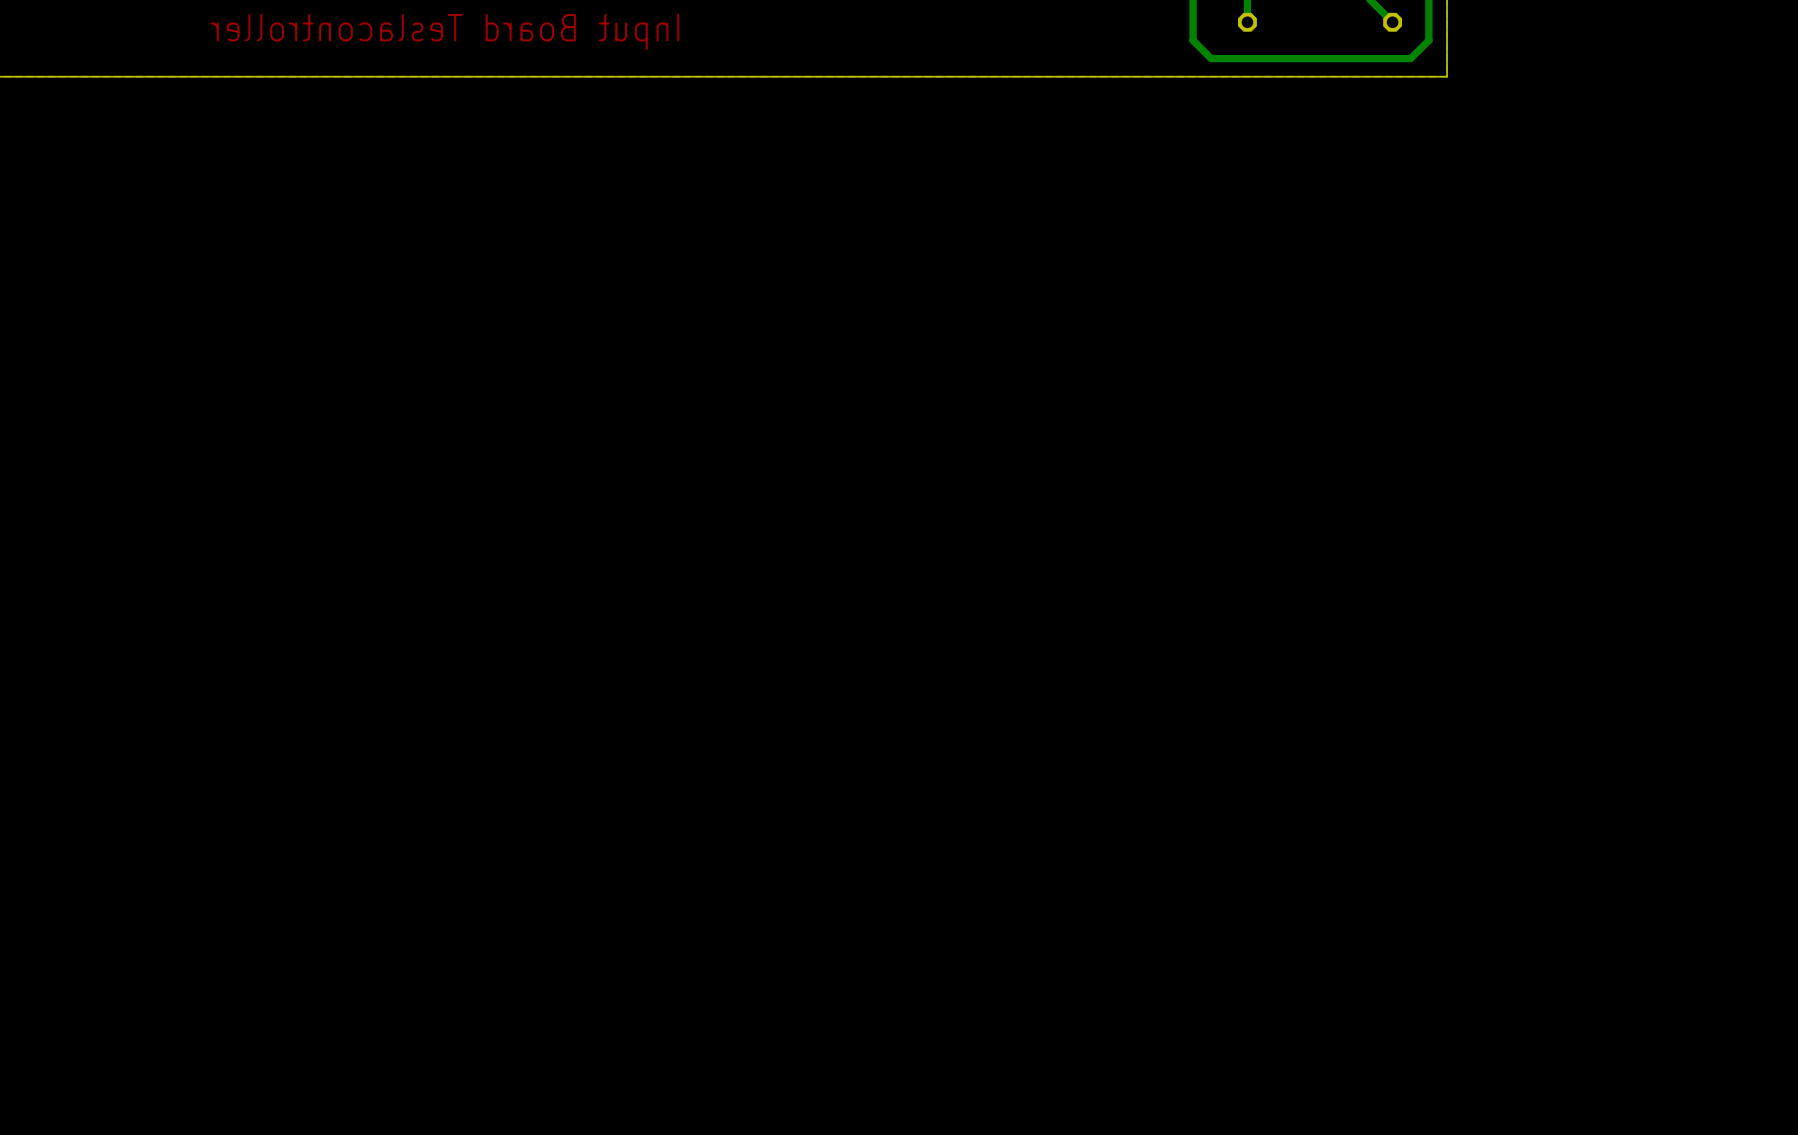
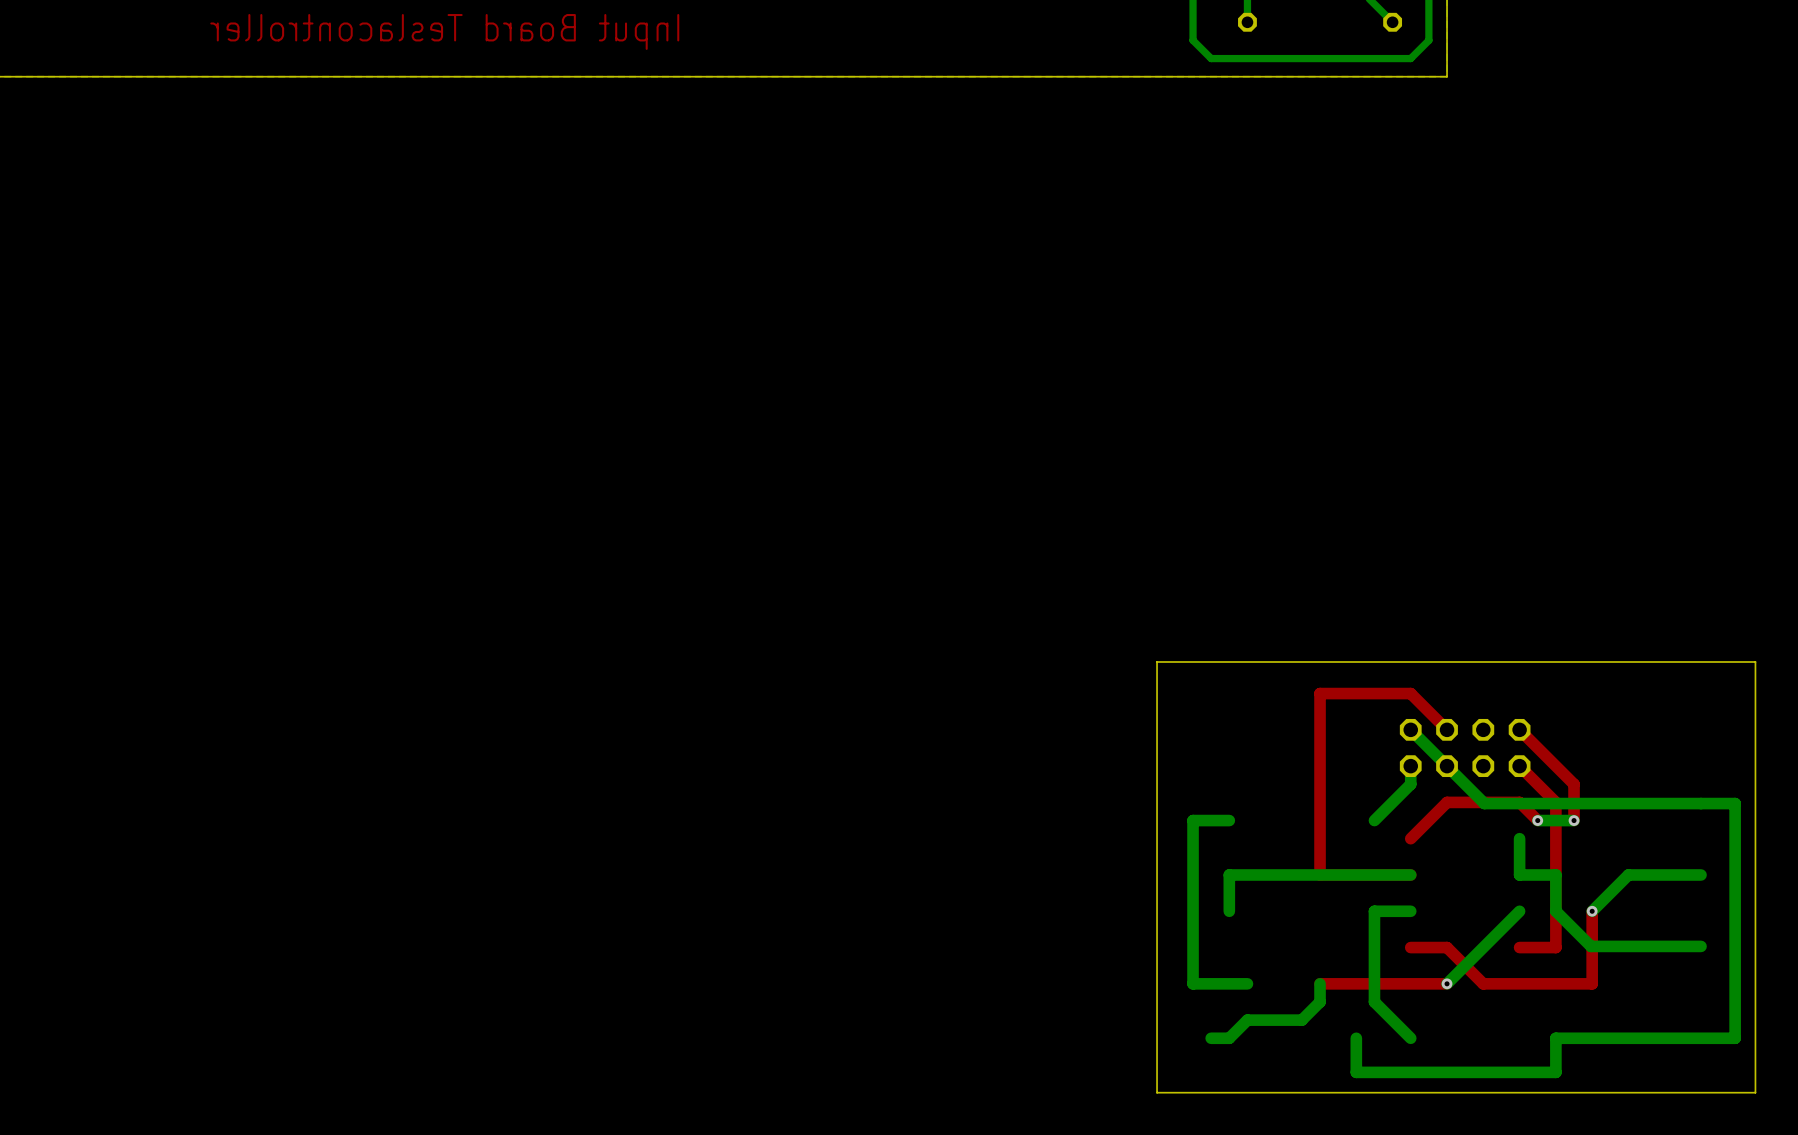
board edge: none -> (1755, 661) (1157, 661) (1157, 1092) (1755, 1092) (1755, 661)
bottom track: none -> (1410, 729) (1484, 803) (1735, 803) (1735, 1038) (1555, 1038) (1555, 1072) (1356, 1072) (1356, 1038)
top track: none -> (1447, 729) (1410, 693) (1320, 693) (1320, 874) (1410, 874)
top track: none -> (1519, 729) (1574, 784) (1574, 820)
part: none -> (1465, 747)
bottom track: none -> (1410, 766) (1410, 784) (1374, 820)
top track: none -> (1519, 766) (1555, 802) (1555, 947) (1519, 947)
bottom track: none -> (1229, 820) (1193, 820) (1193, 983) (1247, 983)
top track: none -> (1537, 820) (1519, 802) (1447, 802) (1410, 838)
via: none -> (1537, 820)
bottom track: none -> (1574, 820) (1537, 820)
via: none -> (1574, 820)
bottom track: none -> (1519, 838) (1519, 874) (1555, 874) (1555, 911) (1591, 946) (1701, 946)
bottom track: none -> (1410, 874) (1229, 874) (1229, 911)
bottom track: none -> (1701, 874) (1628, 874) (1592, 911)
bottom track: none -> (1410, 911) (1374, 911) (1374, 1001) (1410, 1038)
bottom track: none -> (1519, 911) (1447, 983)
top track: none -> (1592, 911) (1592, 983) (1483, 983) (1447, 947) (1410, 947)
via: none -> (1592, 911)
bottom track: none -> (1320, 983) (1320, 1001) (1301, 1020) (1247, 1020) (1229, 1038) (1211, 1038)
top track: none -> (1447, 983) (1320, 983)
via: none -> (1447, 983)

